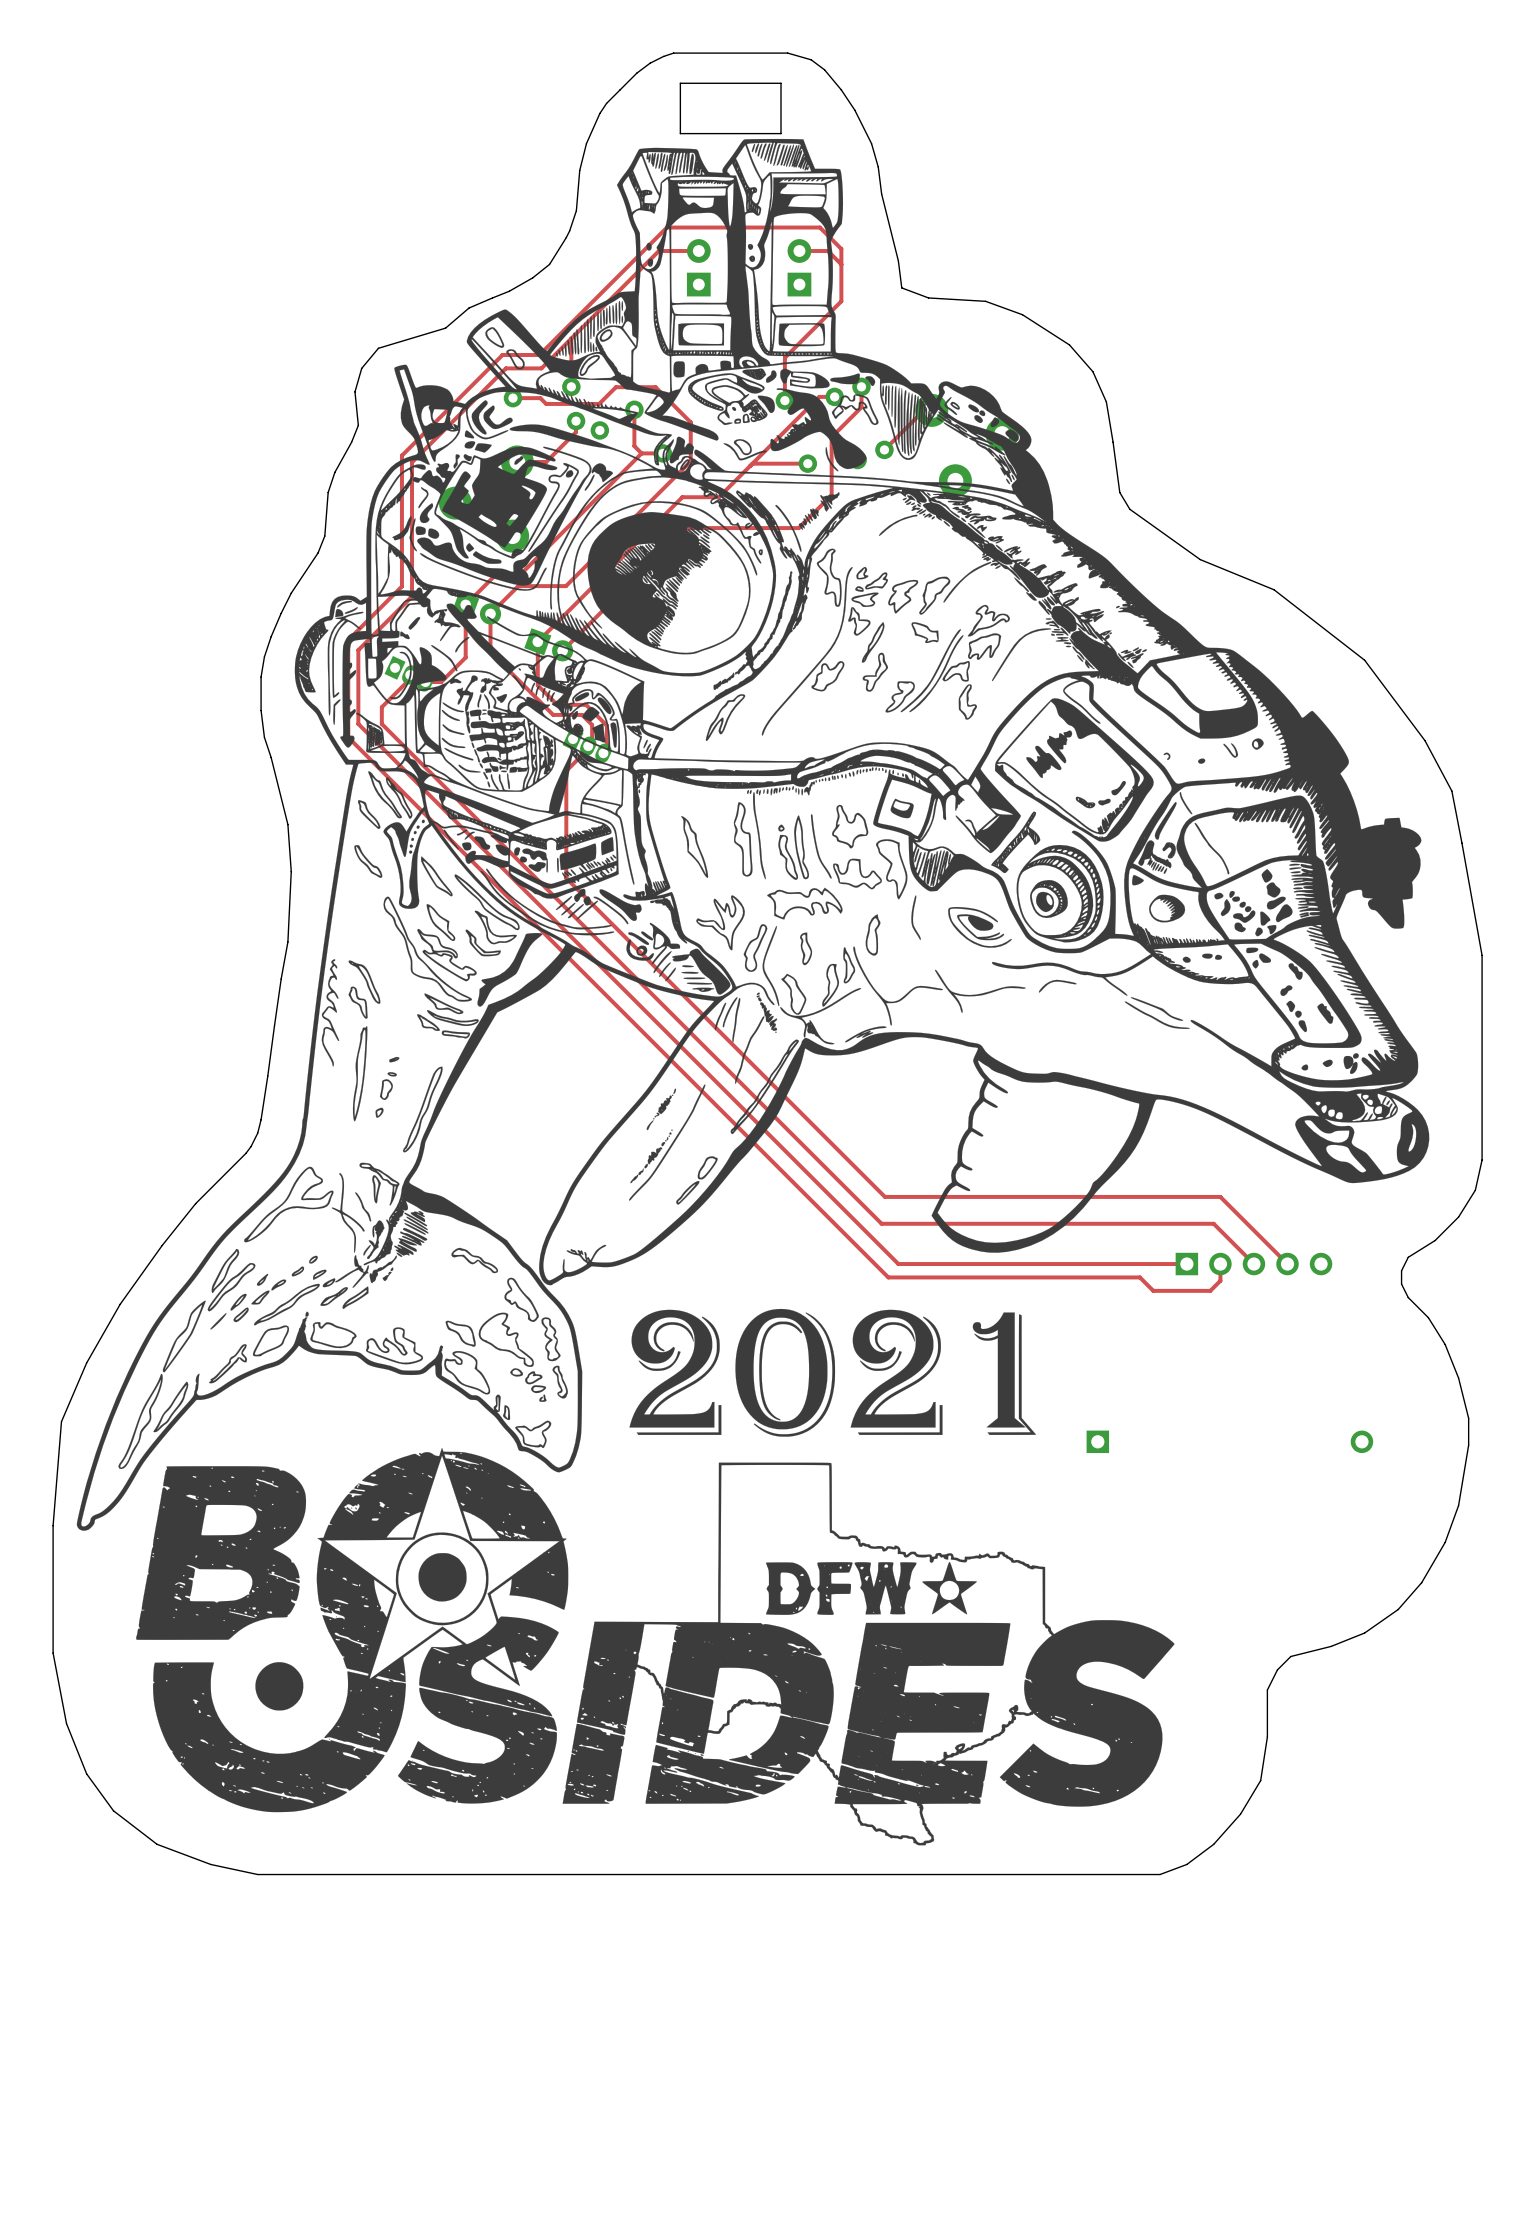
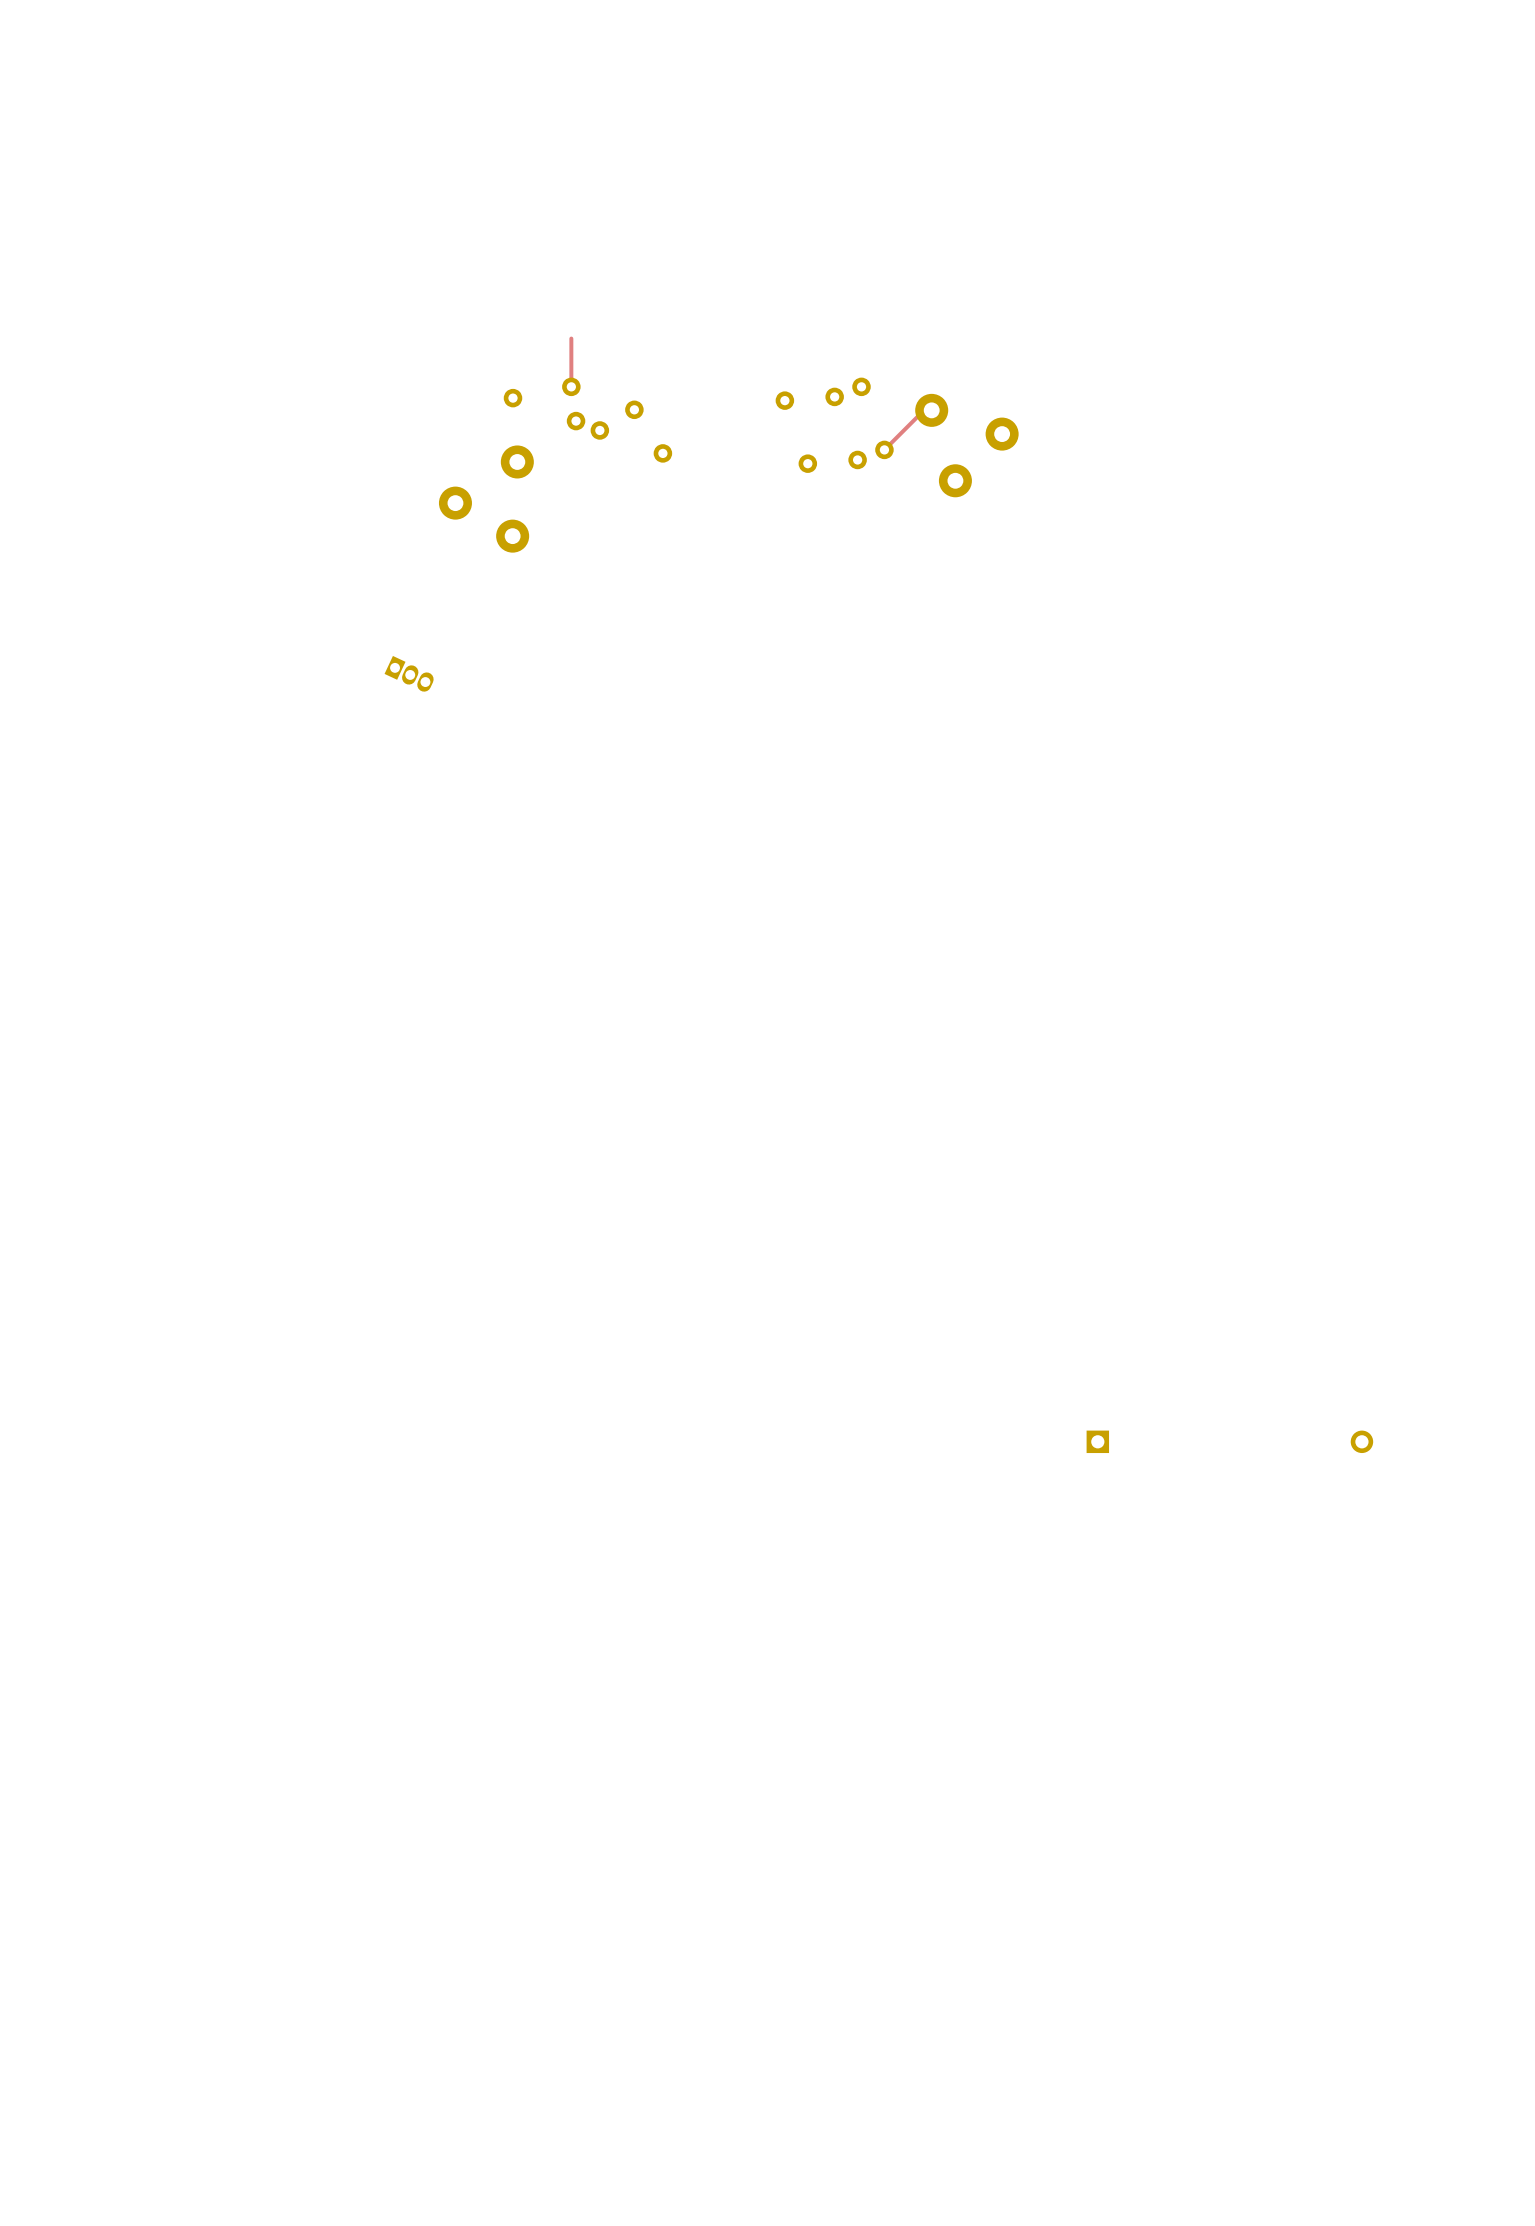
board edge: (673, 53) (650, 63) (636, 73) (606, 103) (599, 113) (586, 143) (579, 170) (576, 210) (566, 237) (549, 264) (532, 277) (509, 291) (469, 308) (445, 328) (378, 348) (361, 368) (354, 391) (358, 425) (351, 442) (334, 472) (328, 492) (324, 536) (318, 552) (291, 593) (281, 613) (264, 656) (261, 677) (261, 710) (264, 737) (287, 824) (291, 871) (287, 942) (257, 1133) (245, 1153) (195, 1203) (162, 1245) (120, 1304) (86, 1362) (61, 1421) (53, 1525) (53, 1653) (66, 1723) (86, 1773) (113, 1810) (157, 1844) (210, 1864) (257, 1874) (1160, 1874) (1186, 1864) (1213, 1844) (1240, 1814) (1260, 1780) (1267, 1737) (1267, 1690) (1277, 1669) (1290, 1656) (1331, 1646) (1364, 1633) (1398, 1609) (1421, 1582) (1445, 1542) (1458, 1505) (1468, 1445) (1468, 1418) (1458, 1378) (1445, 1344) (1428, 1317) (1408, 1297) (1401, 1284) (1401, 1270) (1408, 1257) (1435, 1240) (1458, 1217) (1475, 1190) (1482, 1160) (1482, 955) (1451, 791) (1425, 740) (1364, 660) (1274, 589) (1200, 559) (1129, 509) (1119, 492) (1106, 401) (1092, 371) (1069, 344) (1022, 314) (985, 301) (928, 297) (901, 287) (898, 261) (871, 143) (854, 110) (824, 69) (811, 59) (787, 53) (673, 53) -> none
board edge: (680, 83) (680, 133) (781, 133) (781, 83) (680, 83) -> none
drawing: [76, 138, 1430, 2174] -> none
track: (698, 251) (658, 251) (541, 368) (505, 368) (412, 462) (412, 596) (358, 650) (358, 723) (898, 1264) (1186, 1264) -> none
track: (799, 251) (827, 251) (841, 264) -> none
part: (698, 267) -> none
part: (799, 267) -> none
track: (861, 386) (861, 407) (831, 437) (831, 495) (798, 528) (685, 528) (562, 650) (568, 650) -> none
track: (513, 398) (540, 398) (546, 403) (599, 403) (615, 387) (655, 387) (690, 422) (690, 461) (565, 586) (518, 586) (490, 613) (490, 652) (553, 714) (582, 714) (592, 724) (592, 742) (588, 749) (566, 770) (566, 878) (884, 1196) (1220, 1196) (1287, 1264) -> none
track: (832, 399) (834, 396) (819, 396) (718, 497) (682, 497) (537, 641) (537, 685) (557, 704) (586, 704) (606, 725) (606, 749) -> none
track: (784, 400) (784, 357) (841, 301) (841, 248) (819, 227) (666, 227) (539, 354) (502, 354) (401, 455) (401, 586) (348, 640) (348, 737) (888, 1277) (1139, 1277) (1153, 1290) (1210, 1290) (1220, 1280) (1220, 1264) -> none
track: (634, 409) (634, 446) (641, 453) -> none
track: (576, 421) (576, 432) (546, 461) (517, 461) -> none
track: (641, 453) (662, 453) -> none
track: (641, 453) (520, 575) (495, 575) (465, 604) (465, 657) (441, 682) (425, 682) -> none
track: (752, 463) (807, 463) -> none
part: (476, 607) -> none
part: (548, 644) -> none
track: (410, 678) (381, 707) (381, 723) (881, 1223) (1213, 1223) (1253, 1264) -> none
part: (587, 745) -> none
part: (1253, 1264) -> none

